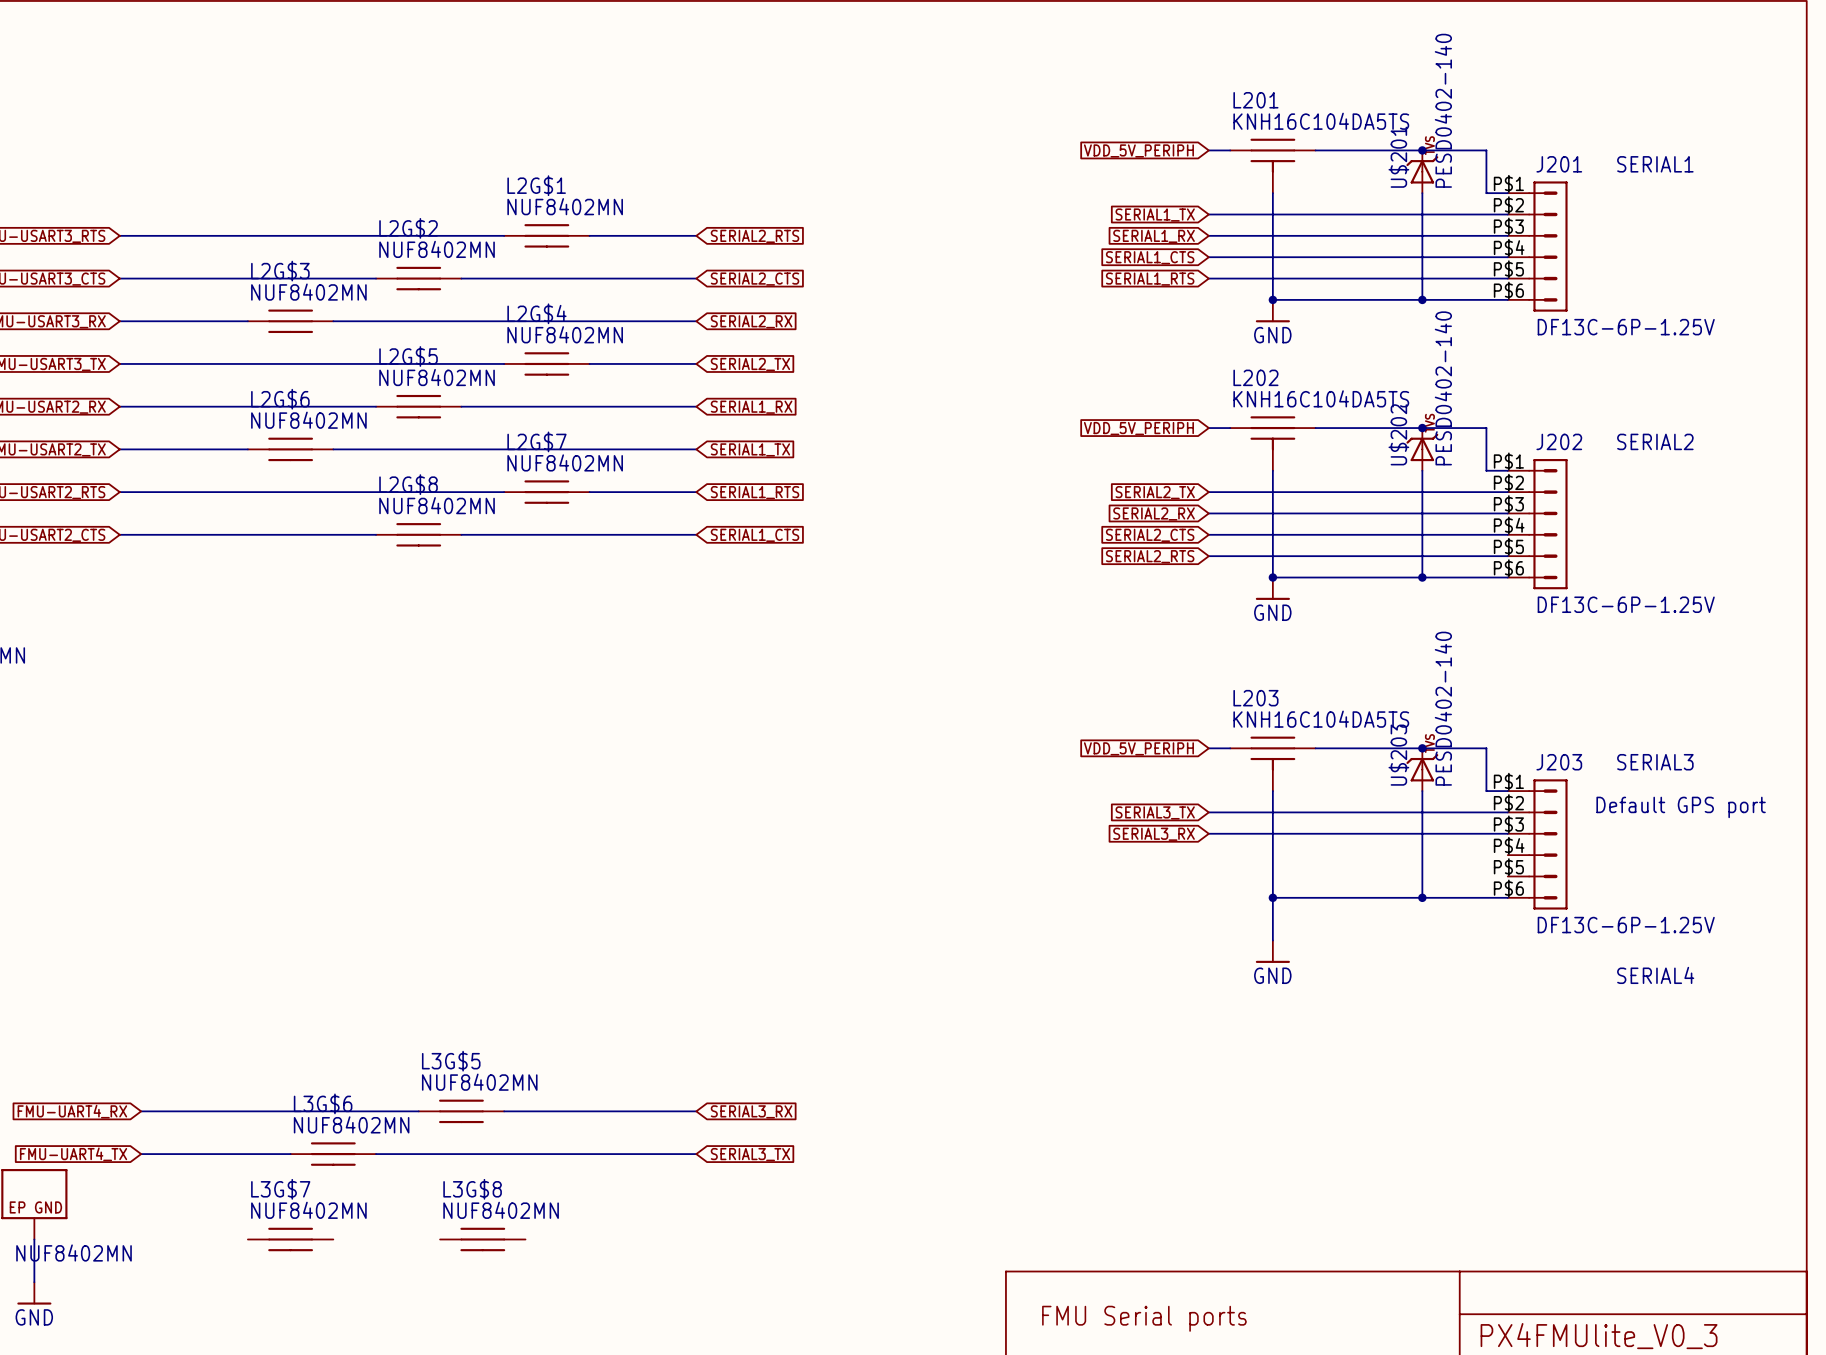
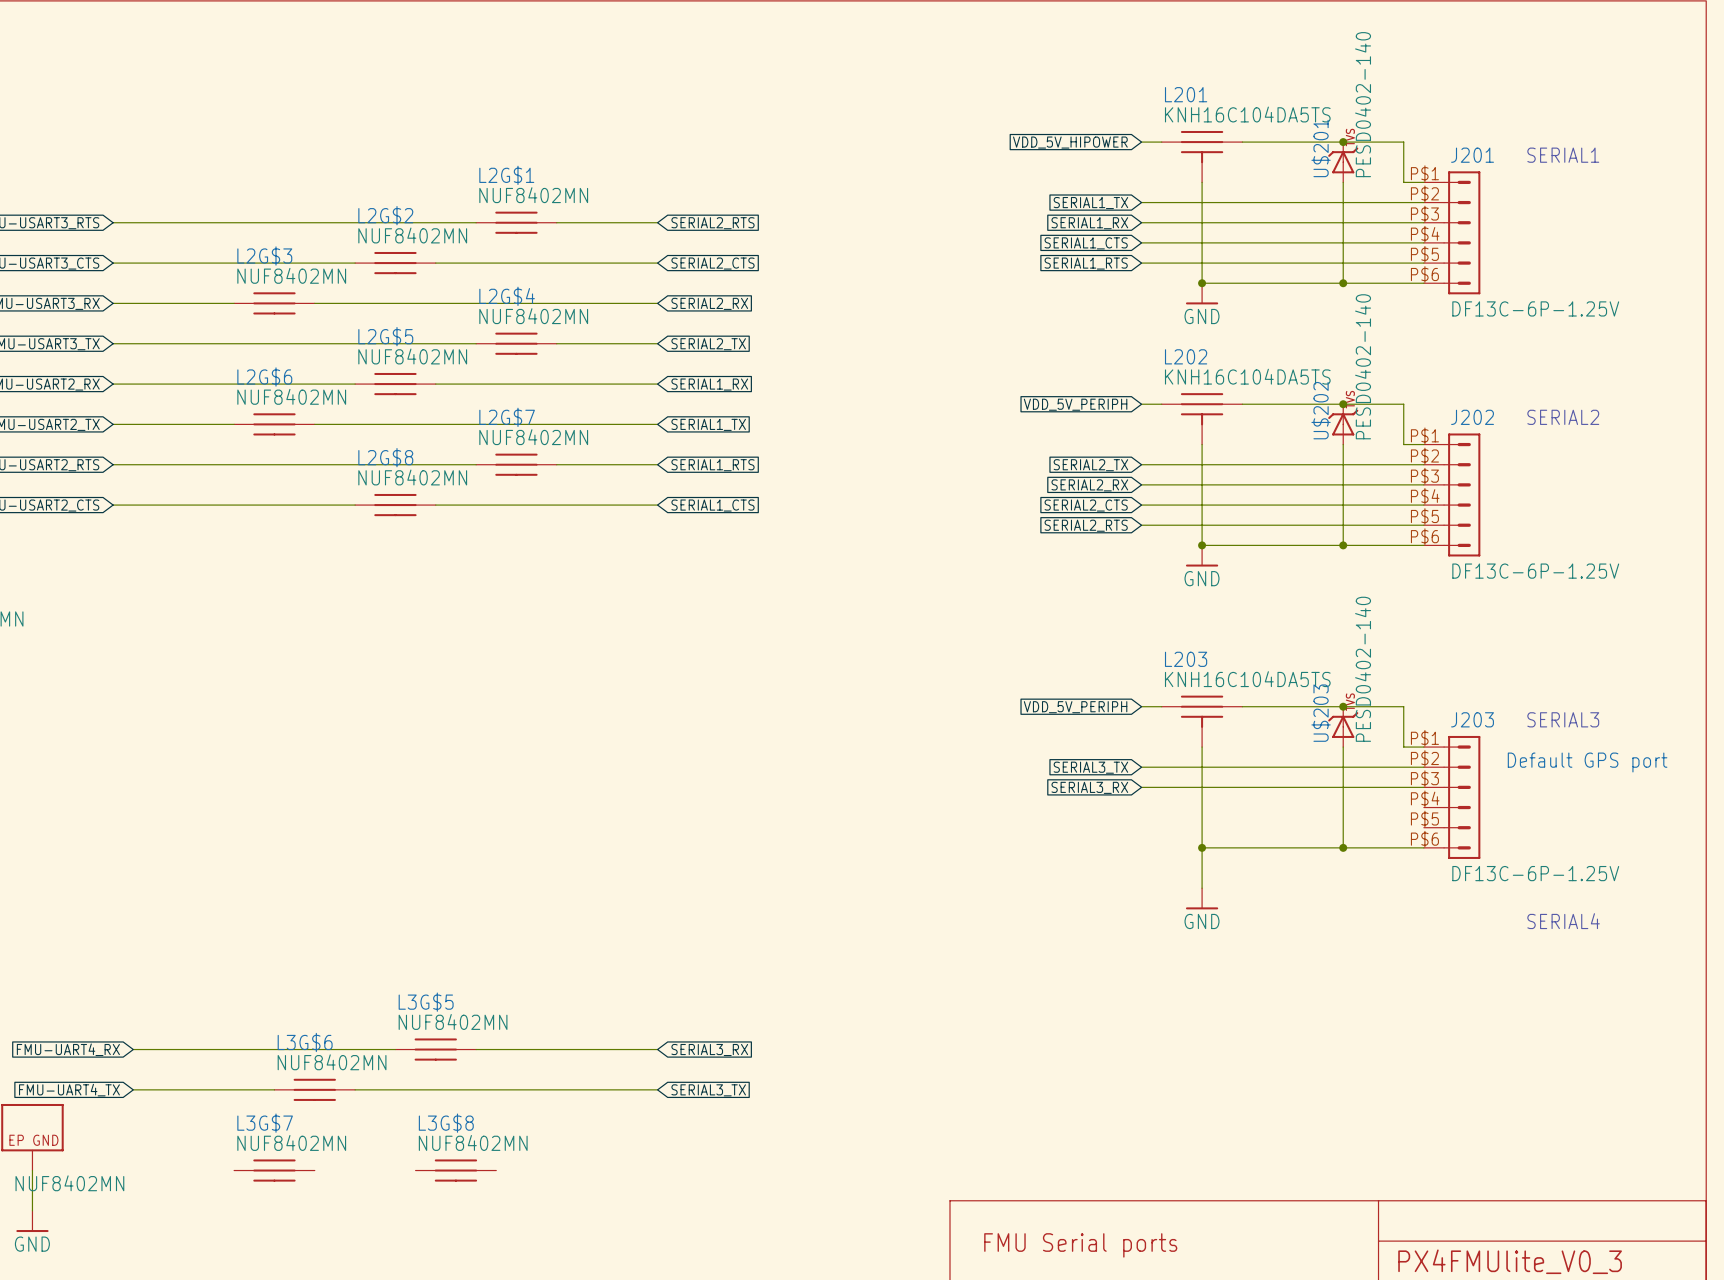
global label: VDD_5V_PERIPH (1138, 150) -> VDD_5V_HIPOWER (1070, 142)

